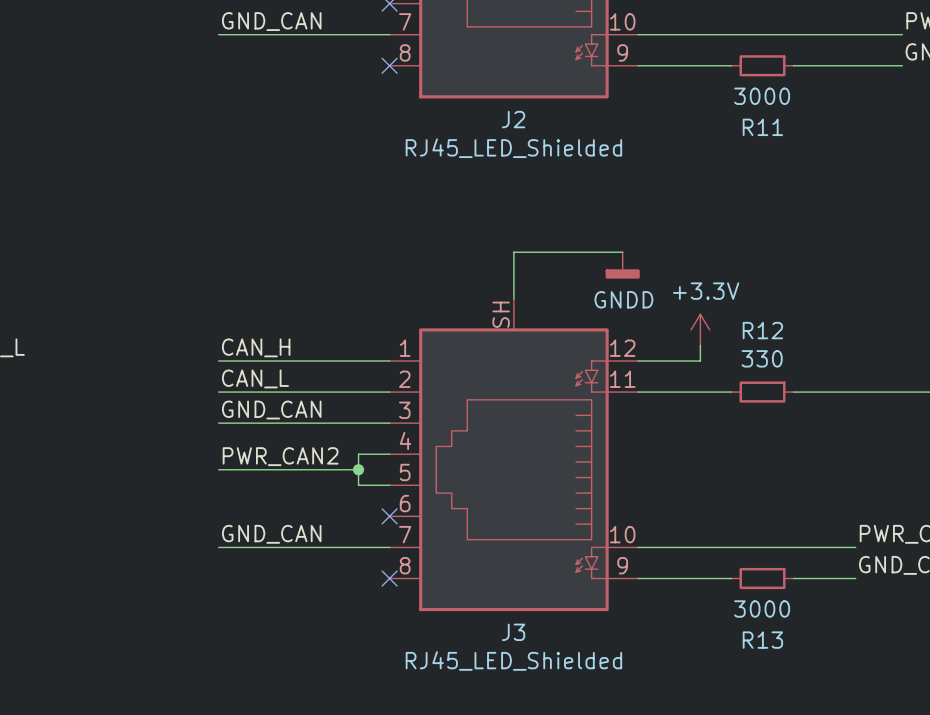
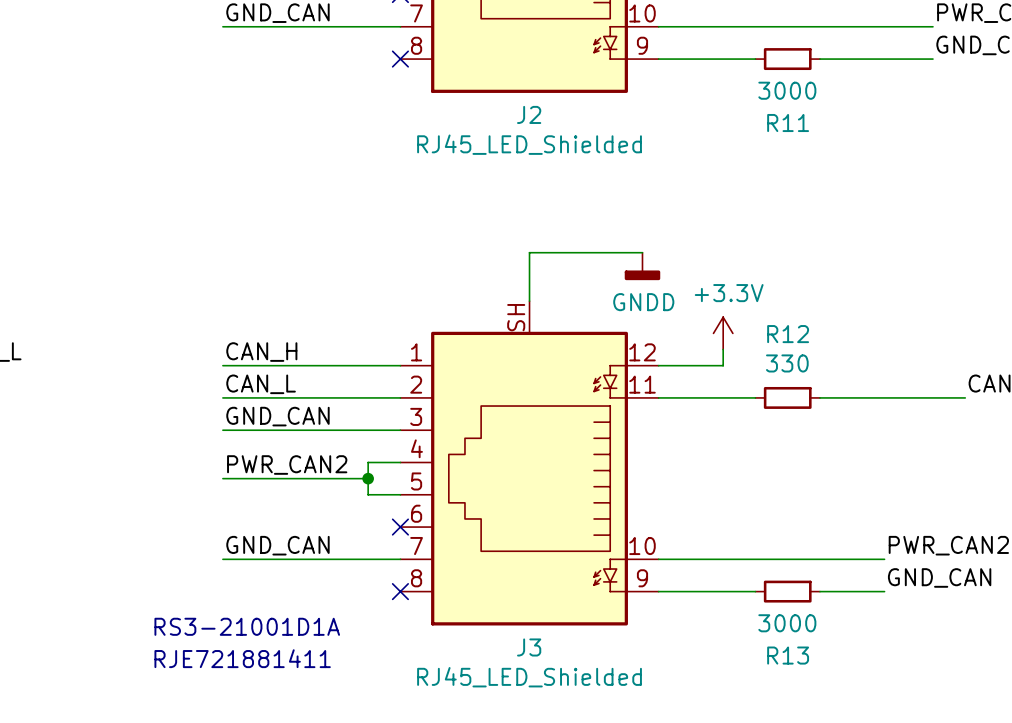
text: none -> RS3-21001D1A (247, 626)
text: none -> RJE721881411 (242, 658)

